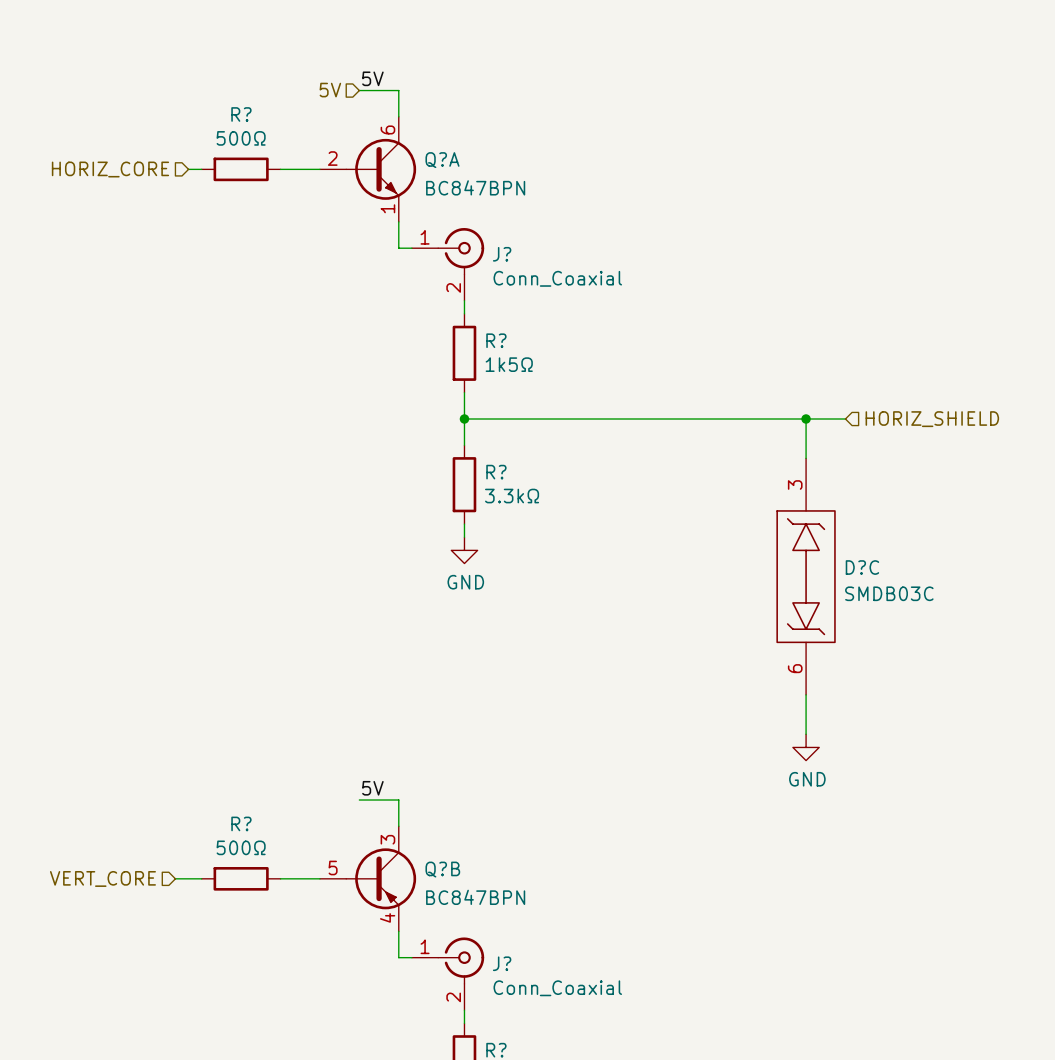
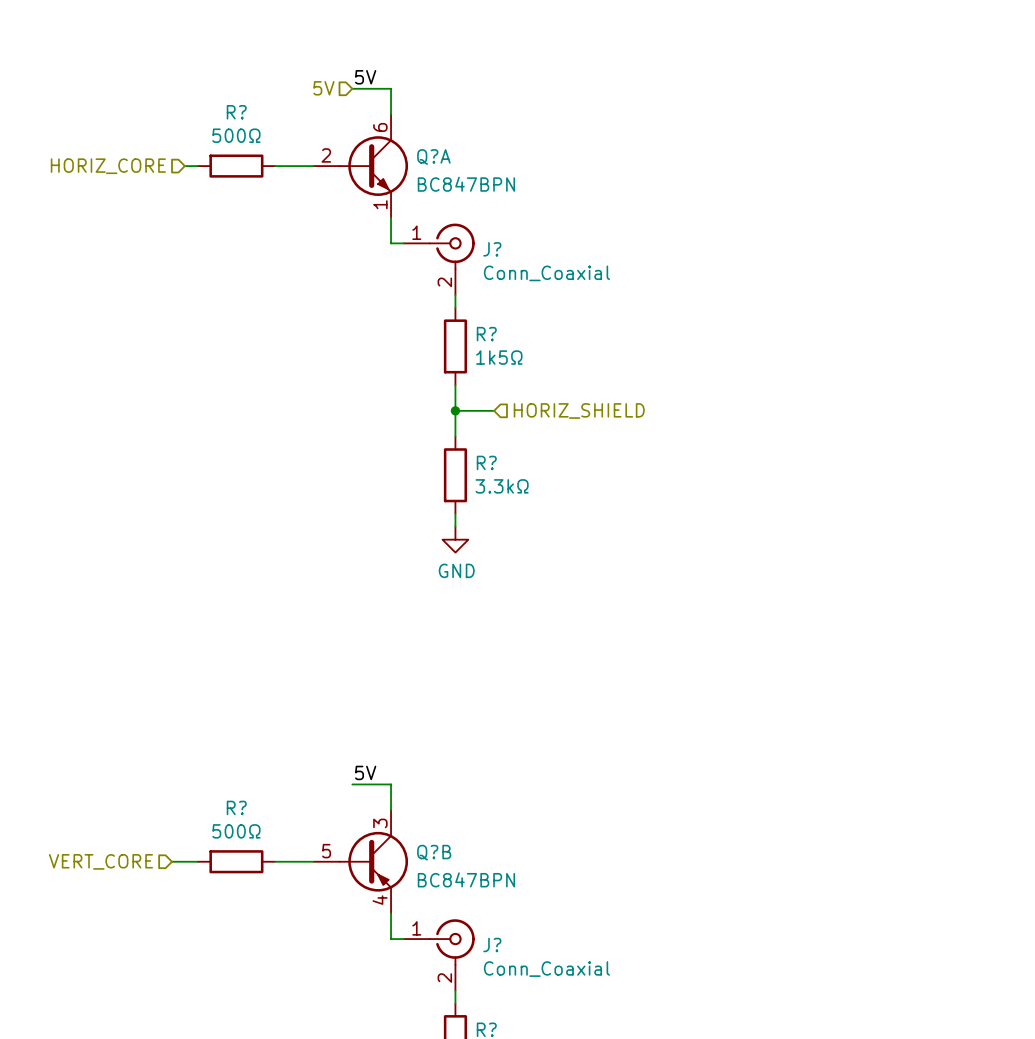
wire: (503, 419) (845, 419) -> none
hierarchical label: none -> HORIZ_SHIELD (579, 410)
wire: (806, 419) (806, 458) -> none
junction: (806, 419) -> none
hierarchical label: HORIZ_SHIELD (932, 419) -> none
D?C: SMDB03C (806, 576) -> none
wire: (806, 694) (806, 734) -> none
power symbol: GND (806, 747) -> none

